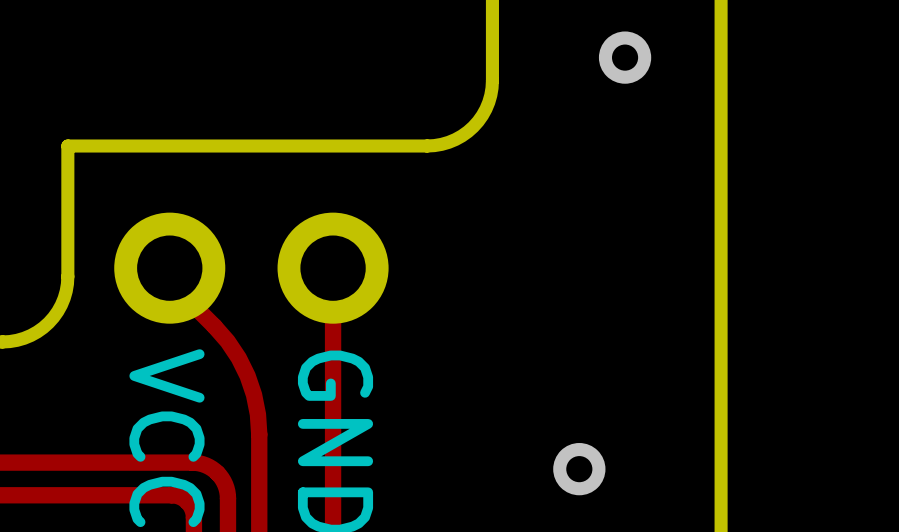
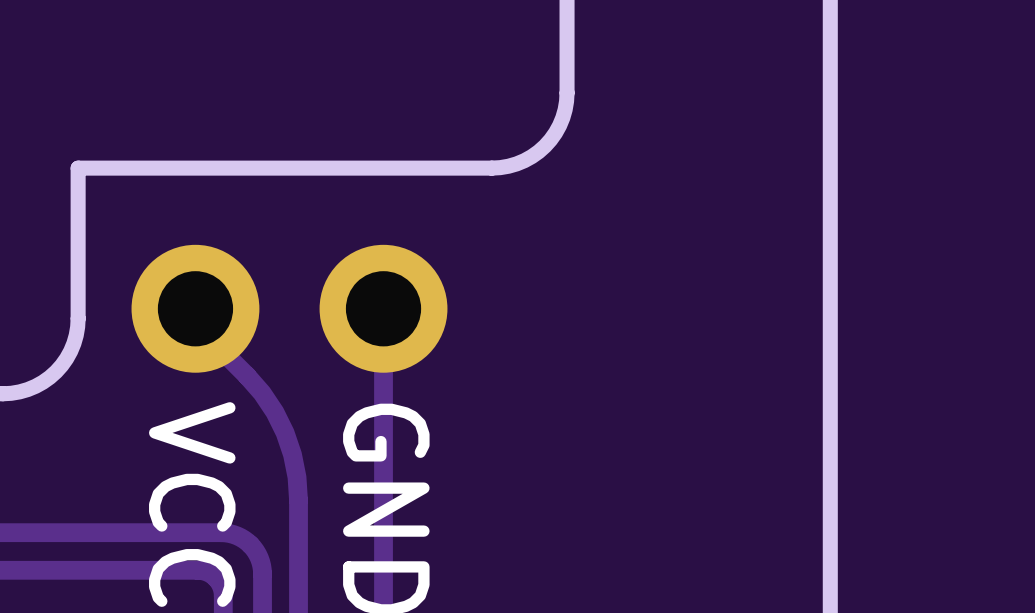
via: (625, 57) -> none
via: (579, 469) -> none

